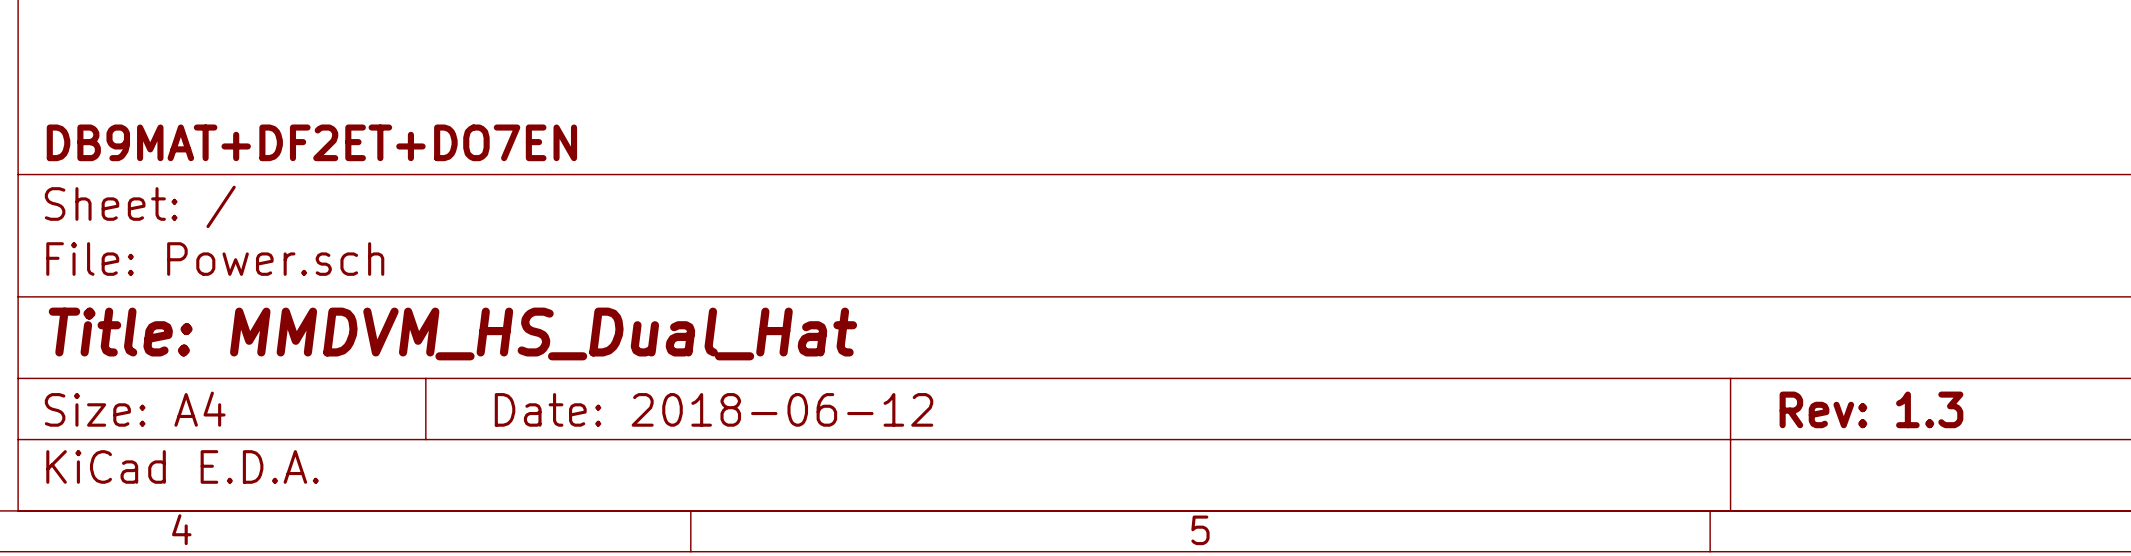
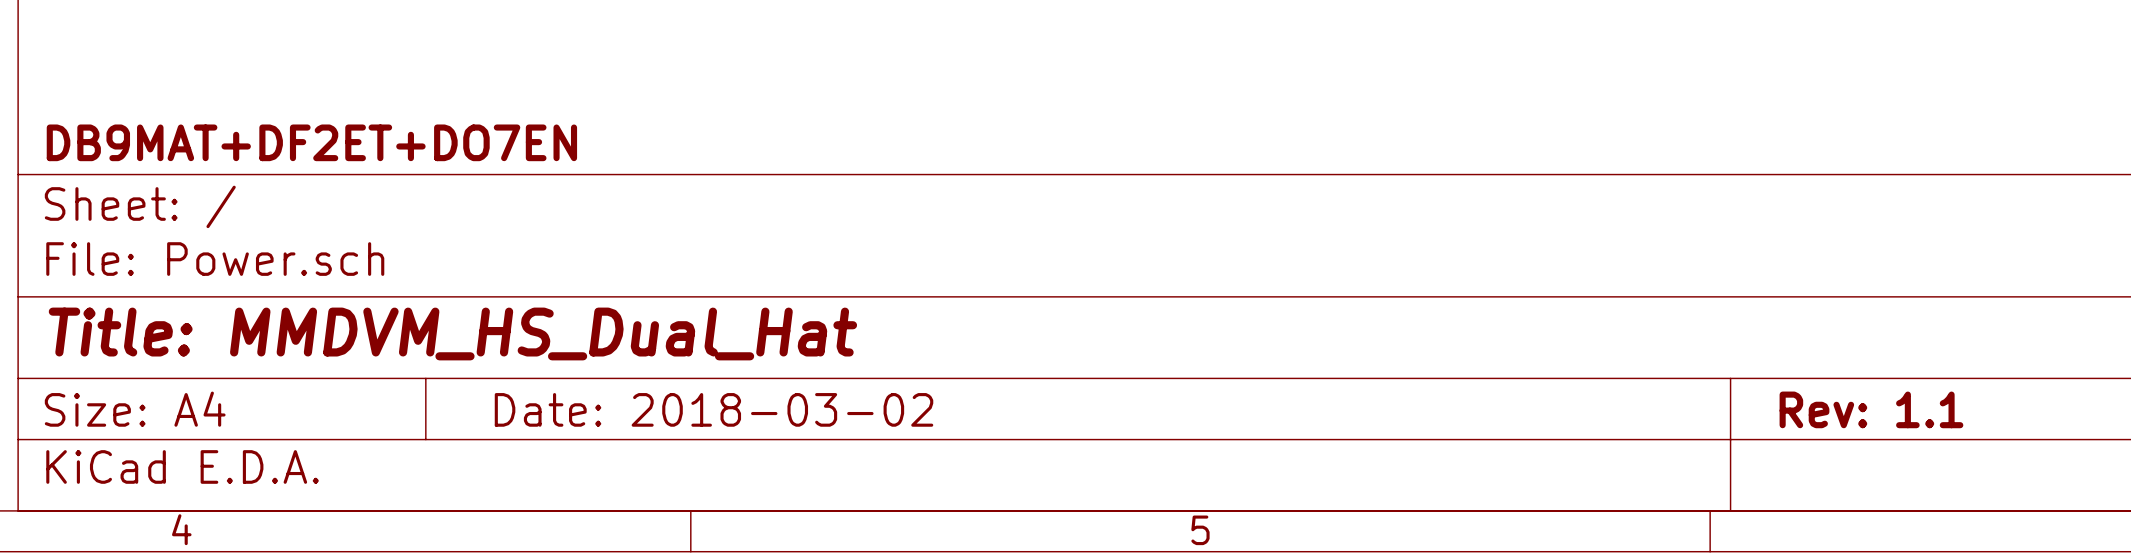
title block: Date: 2018-06-12 (714, 409) -> Date: 2018-03-02 (714, 409)
title block: Rev: 1.3 (1871, 409) -> Rev: 1.1 (1871, 409)

